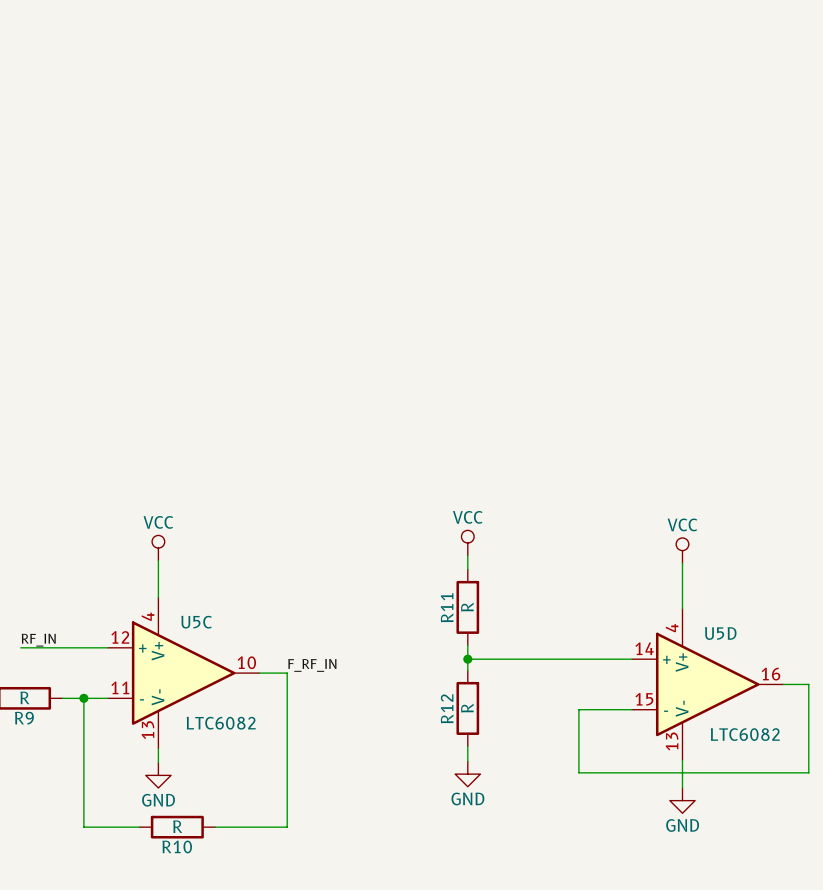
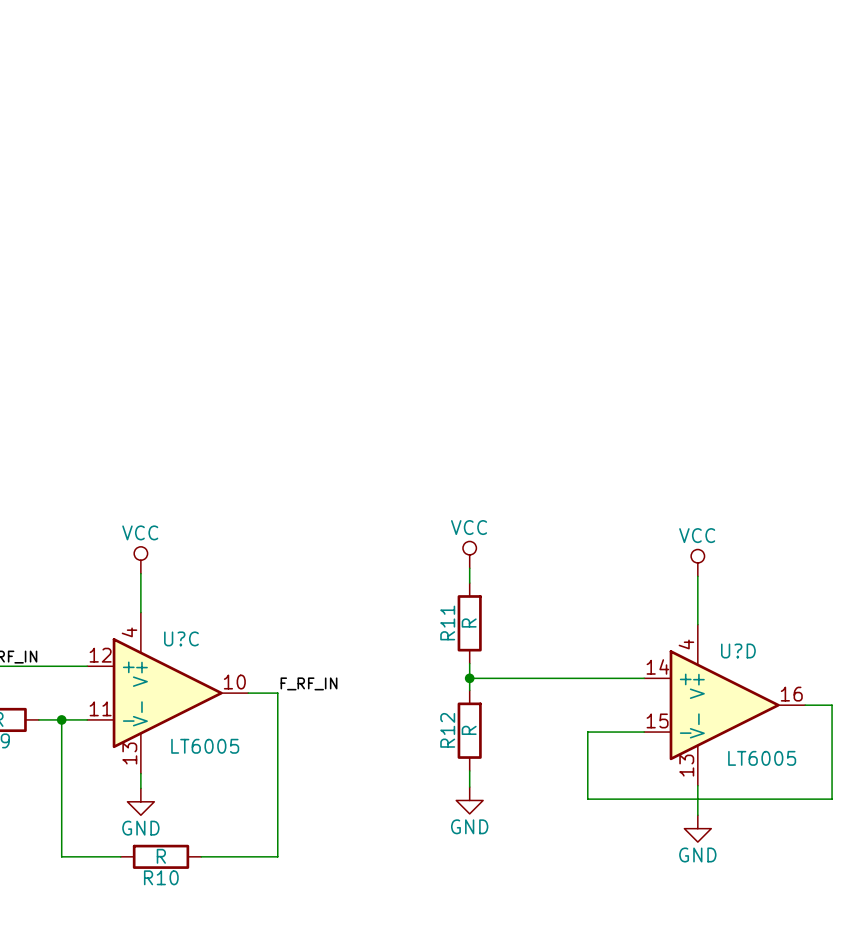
U5C name: U5C (196, 622) -> U?C (181, 638)
U5D name: U5D (720, 633) -> U?D (738, 651)
U5C value: LTC6082 (221, 723) -> LT6005 (205, 746)
U5D value: LTC6082 (745, 734) -> LT6005 (762, 758)

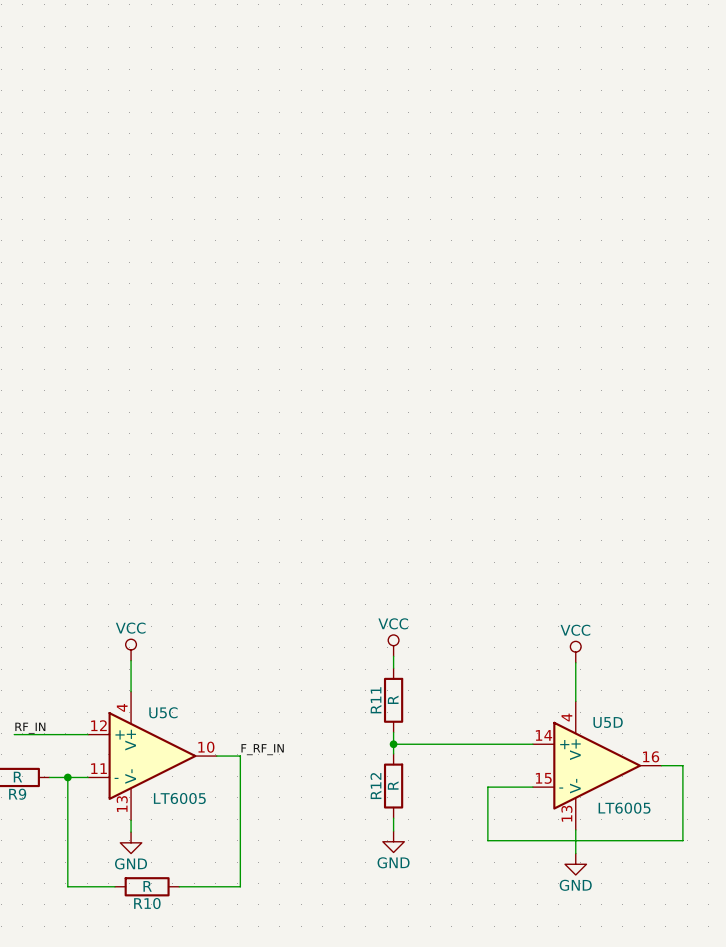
U?C name: U?C (181, 638) -> U5C (163, 712)
U?D name: U?D (738, 651) -> U5D (608, 722)

